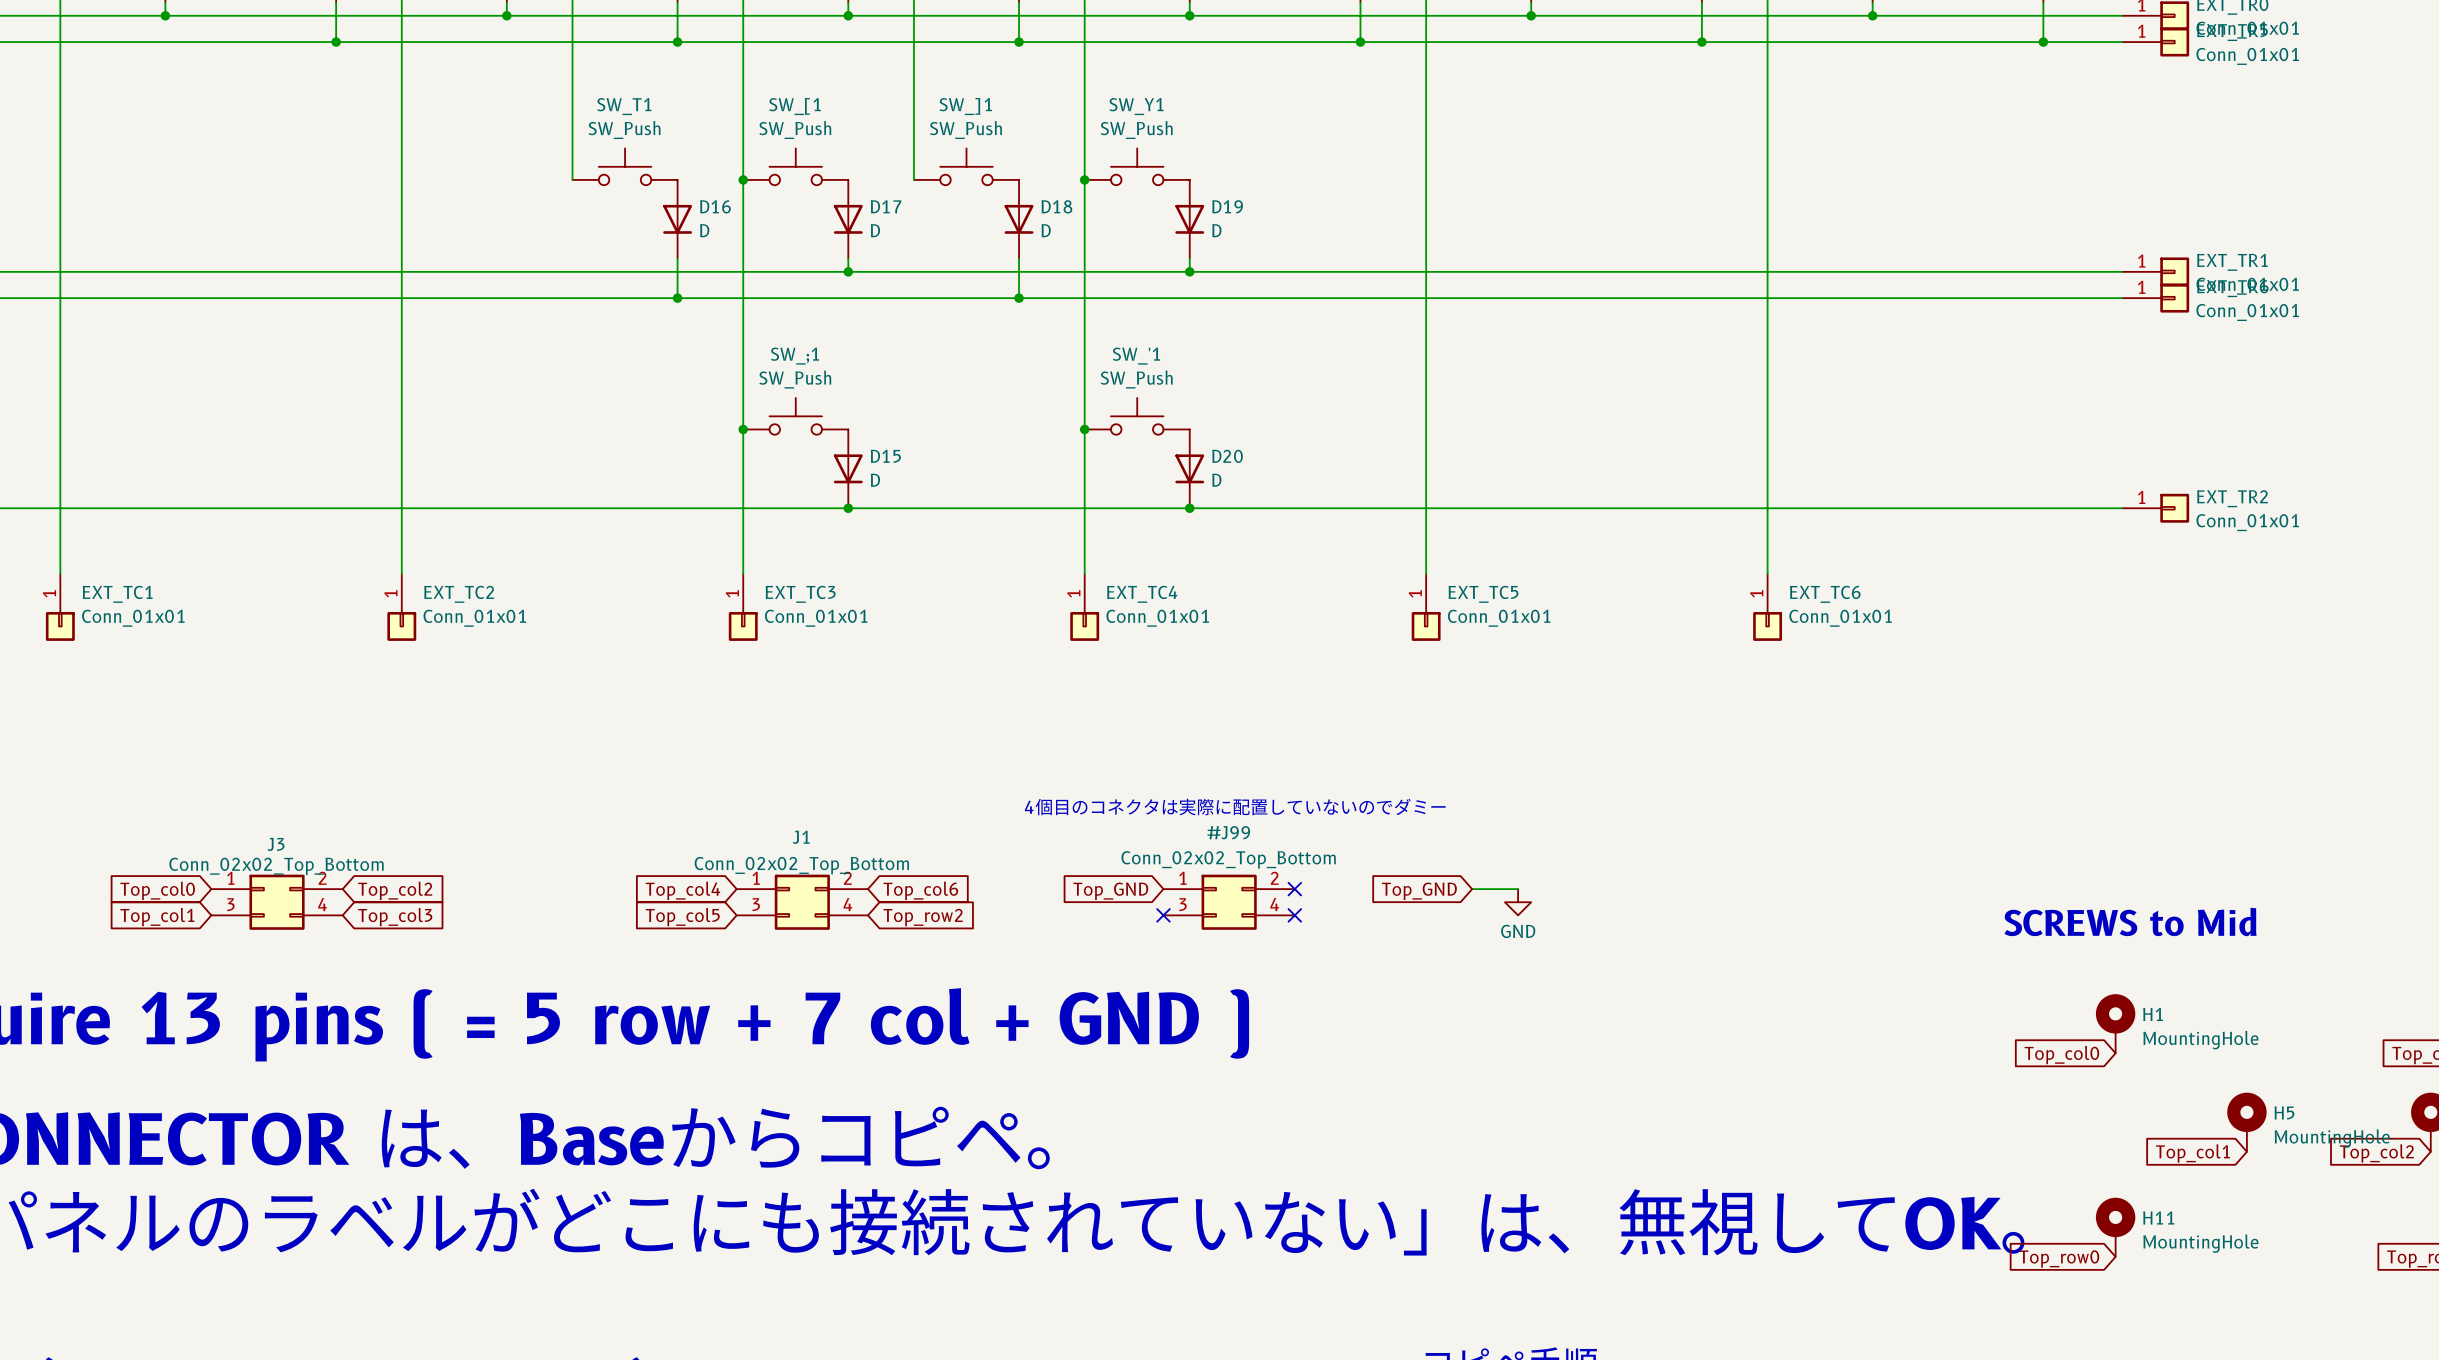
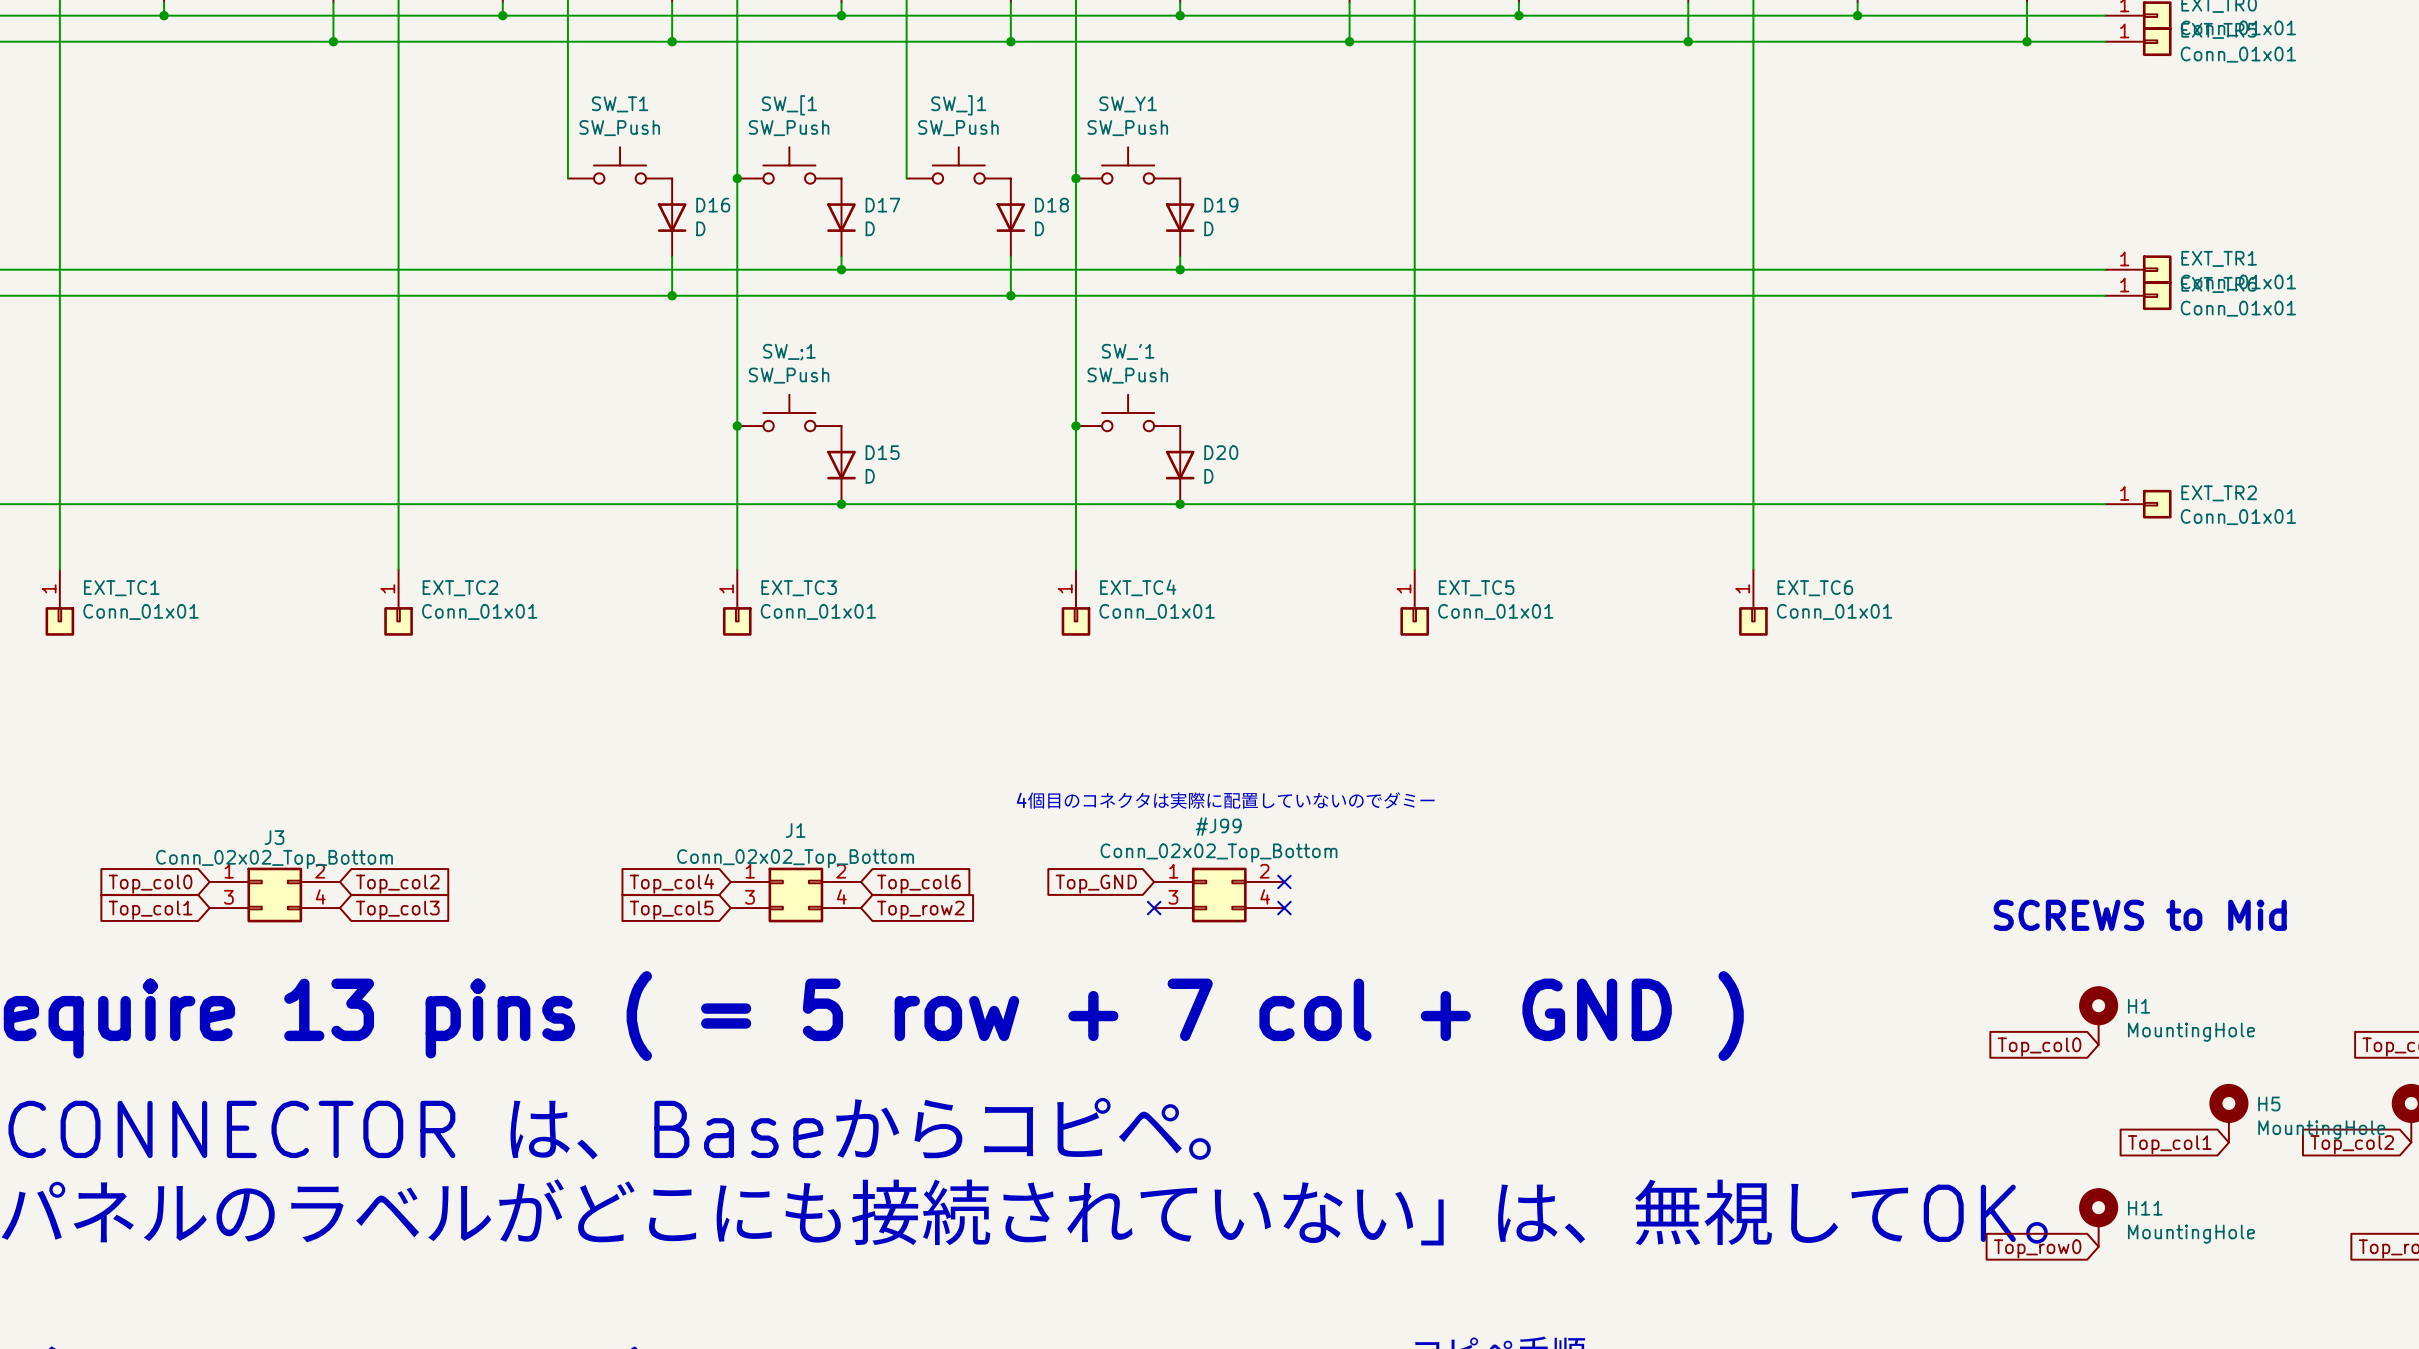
wire: (1472, 889) (1518, 889) -> none
global label: Top_GND (1419, 891) -> none
power symbol: GND (1518, 902) -> none

